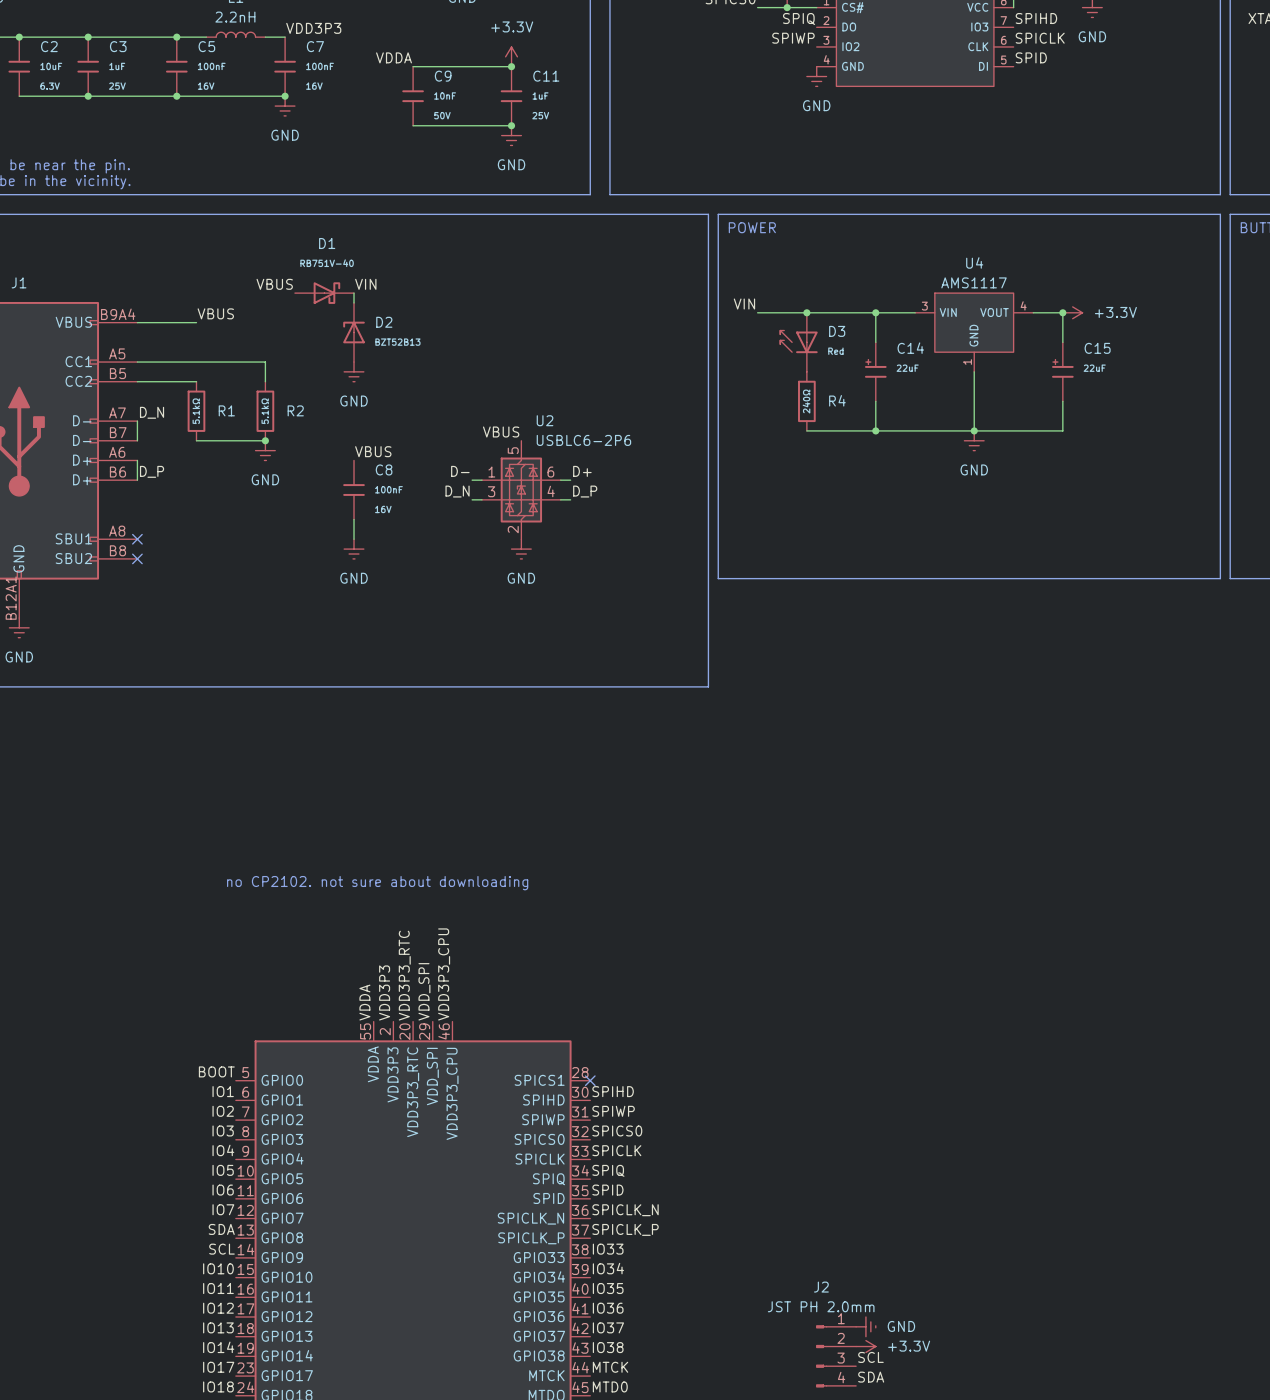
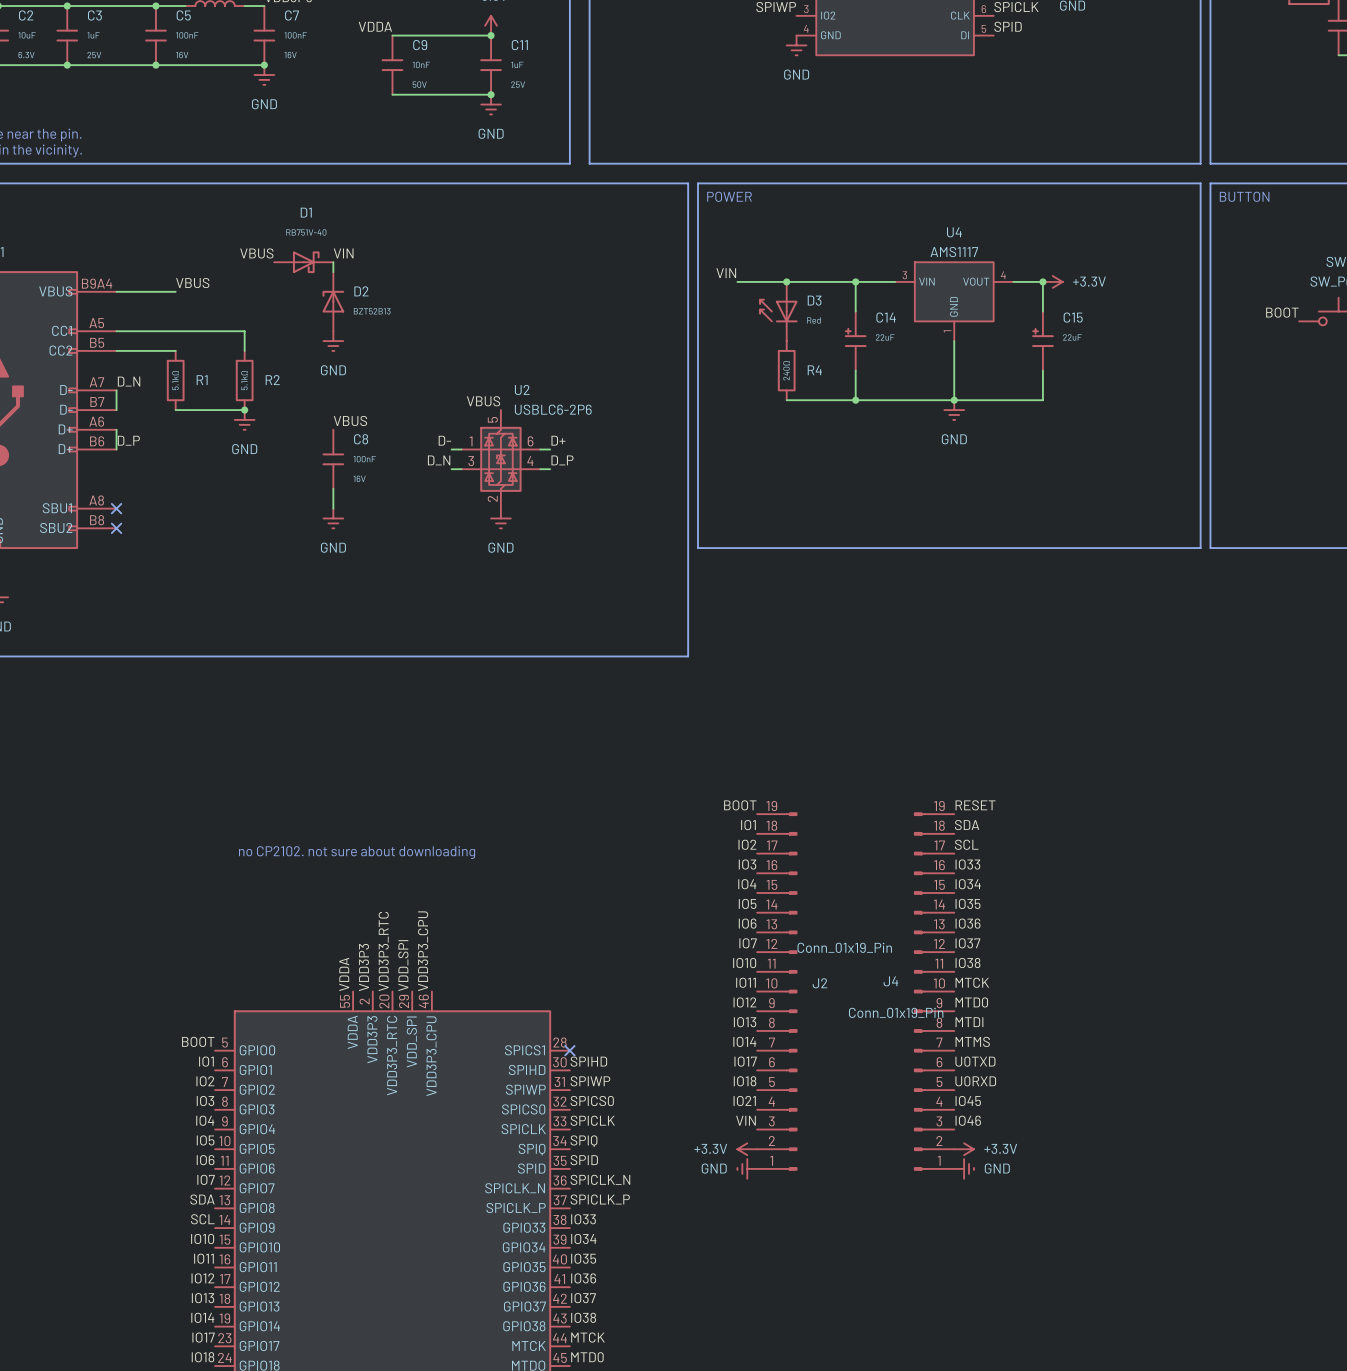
label: none -> BOOT (740, 805)
label: none -> RESET (975, 805)
label: none -> IO1 (748, 825)
label: none -> SDA (967, 825)
label: none -> IO2 (747, 844)
label: none -> SCL (966, 844)
label: none -> IO3 (747, 864)
label: none -> IO33 (967, 864)
label: none -> IO4 (747, 884)
label: none -> IO34 (968, 884)
label: none -> IO5 (747, 903)
label: none -> IO35 (968, 903)
label: none -> IO6 (747, 923)
label: none -> IO36 (968, 923)
label: none -> IO7 (748, 943)
label: none -> IO37 (967, 943)
label: none -> IO10 (744, 963)
label: none -> IO38 (967, 963)
label: none -> IO11 (746, 982)
label: none -> MTCK (972, 982)
J4: none -> Conn_01x19_Pin (934, 991)
label: none -> IO12 (744, 1002)
label: none -> MTD0 (971, 1002)
label: none -> IO13 (745, 1022)
label: none -> MTDI (969, 1022)
label: none -> IO14 (744, 1041)
label: none -> MTMS (972, 1041)
label: none -> IO17 (745, 1061)
label: none -> U0TXD (975, 1061)
label: none -> IO18 (745, 1081)
label: none -> U0RXD (975, 1081)
label: none -> IO21 (744, 1101)
label: none -> IO45 (968, 1101)
label: none -> VIN (745, 1120)
label: none -> IO46 (968, 1120)
power symbol: none -> +3.3V (747, 1149)
power symbol: none -> +3.3V (964, 1149)
power symbol: none -> GND (747, 1168)
power symbol: none -> GND (964, 1168)
J2 name position: J2 (821, 1287) -> J2 (819, 983)
J2 value: JST PH 2.0mm (821, 1306) -> Conn_01x19_Pin (844, 947)
J2 symbol: [816, 1325, 857, 1388] -> [757, 812, 798, 1171]
power symbol: GND (865, 1326) -> none
power symbol: +3.3V (865, 1346) -> none
label: SCL (870, 1357) -> none
label: SDA (871, 1377) -> none

